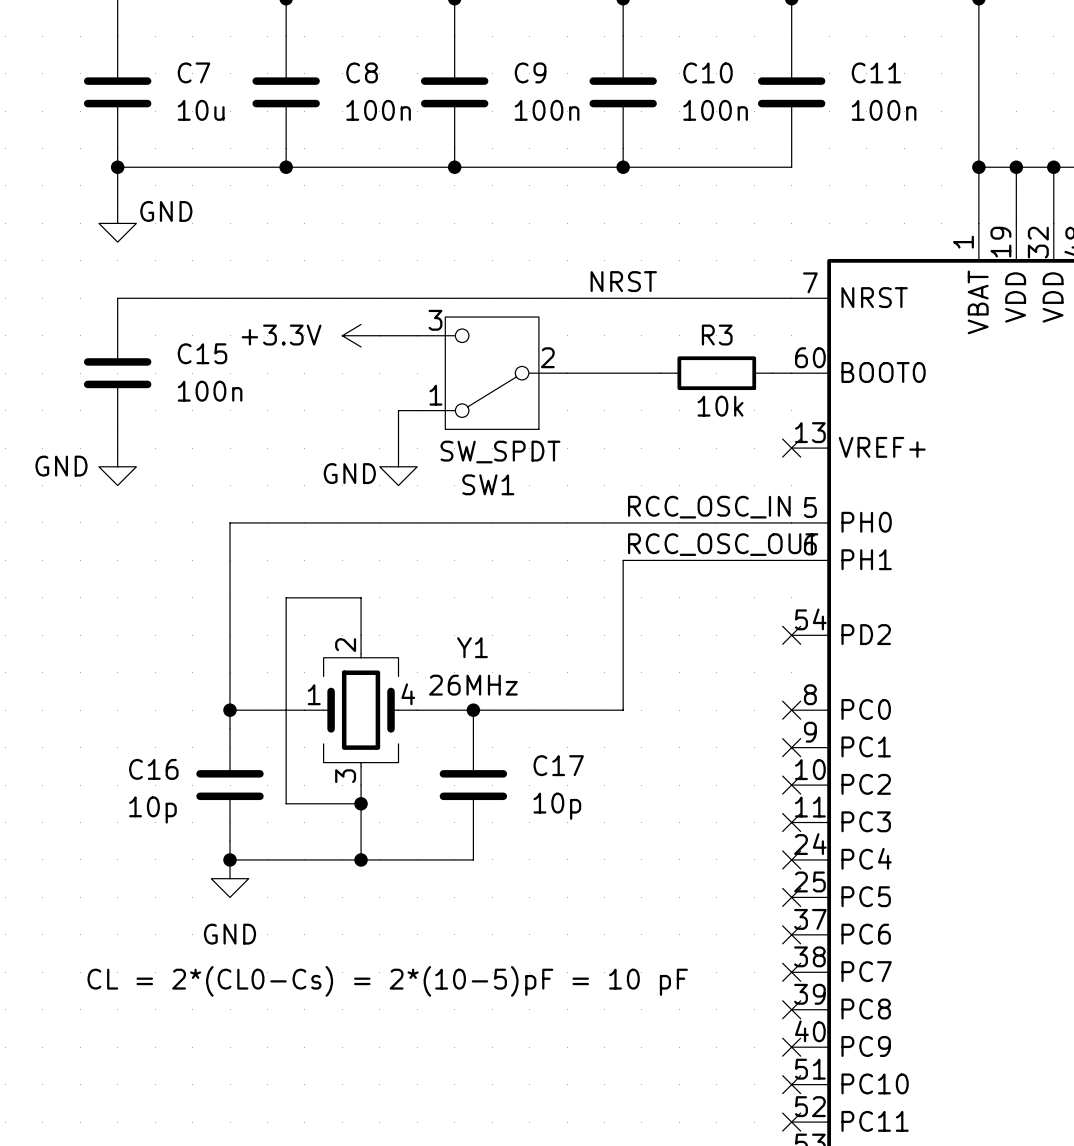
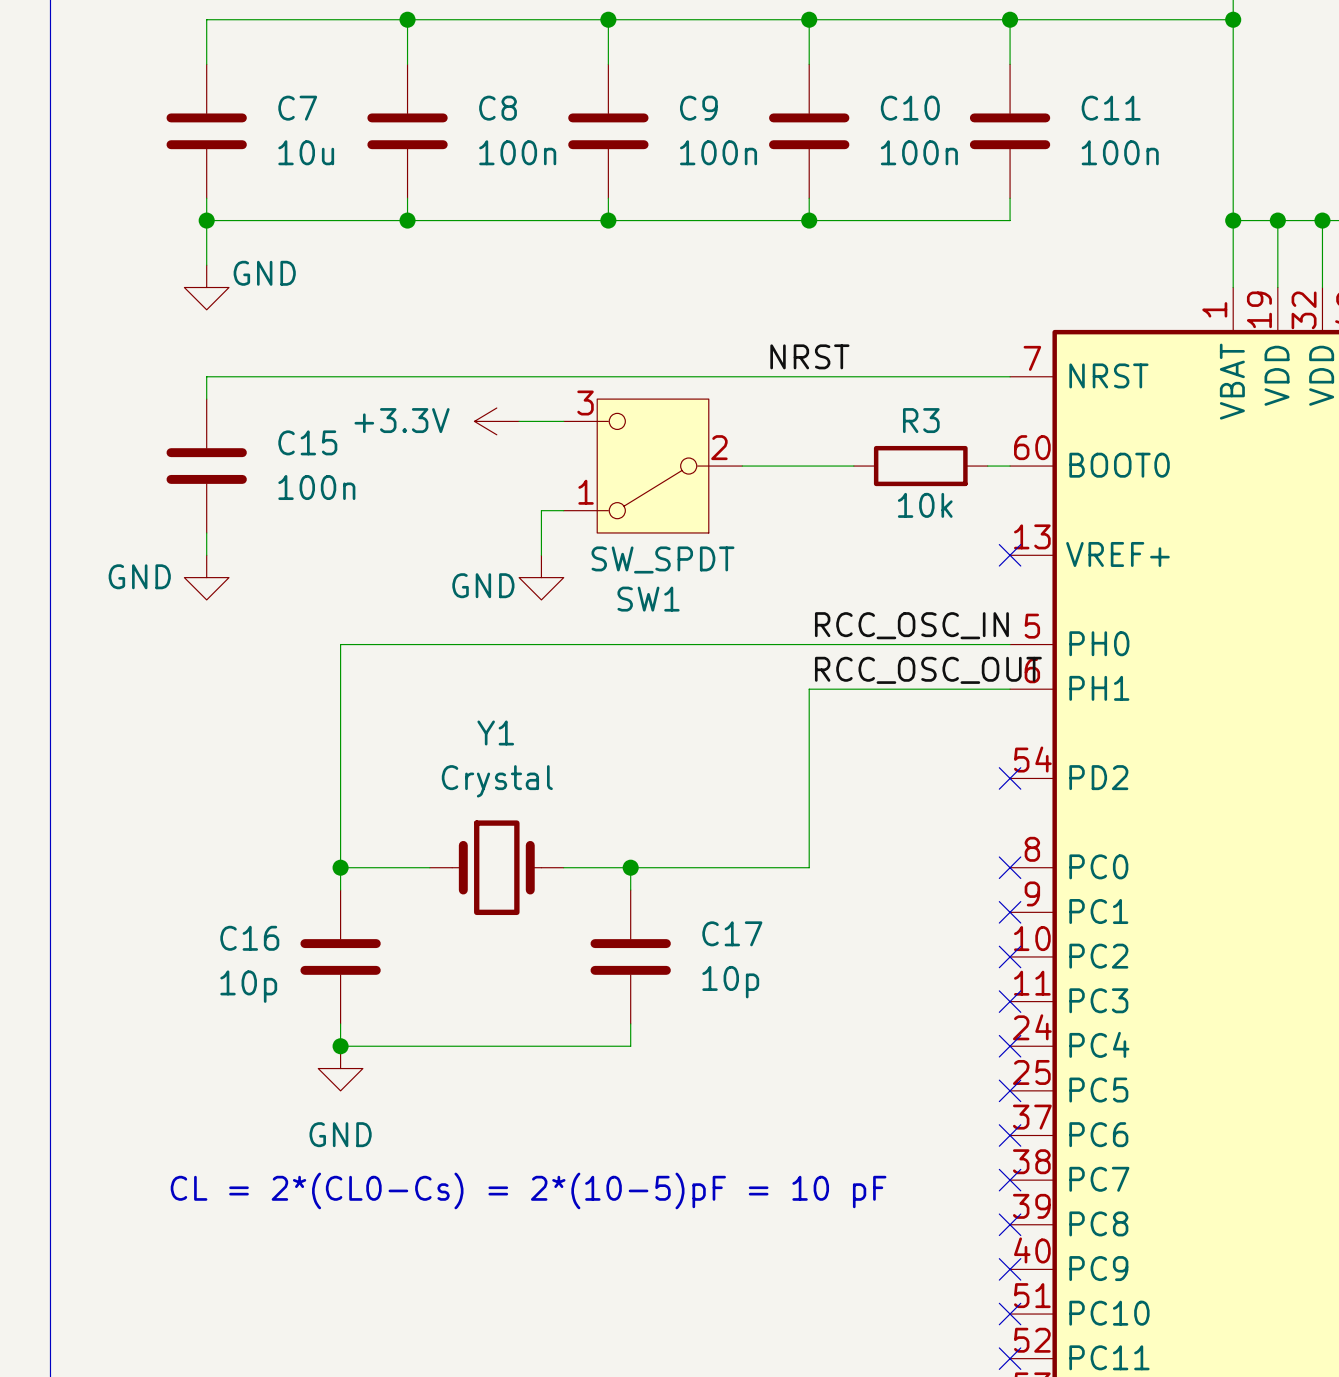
Y1 symbol: [304, 635, 418, 786] -> [429, 820, 564, 916]
wire: (361, 635) (361, 597) (286, 597) (286, 803) (361, 803) -> none
Y1 name position: Y1 (472, 647) -> Y1 (495, 732)
Y1 value: 26MHz (473, 685) -> Crystal (497, 781)
wire: (361, 785) (361, 859) -> none
junction: (361, 803) -> none
junction: (361, 859) -> none

